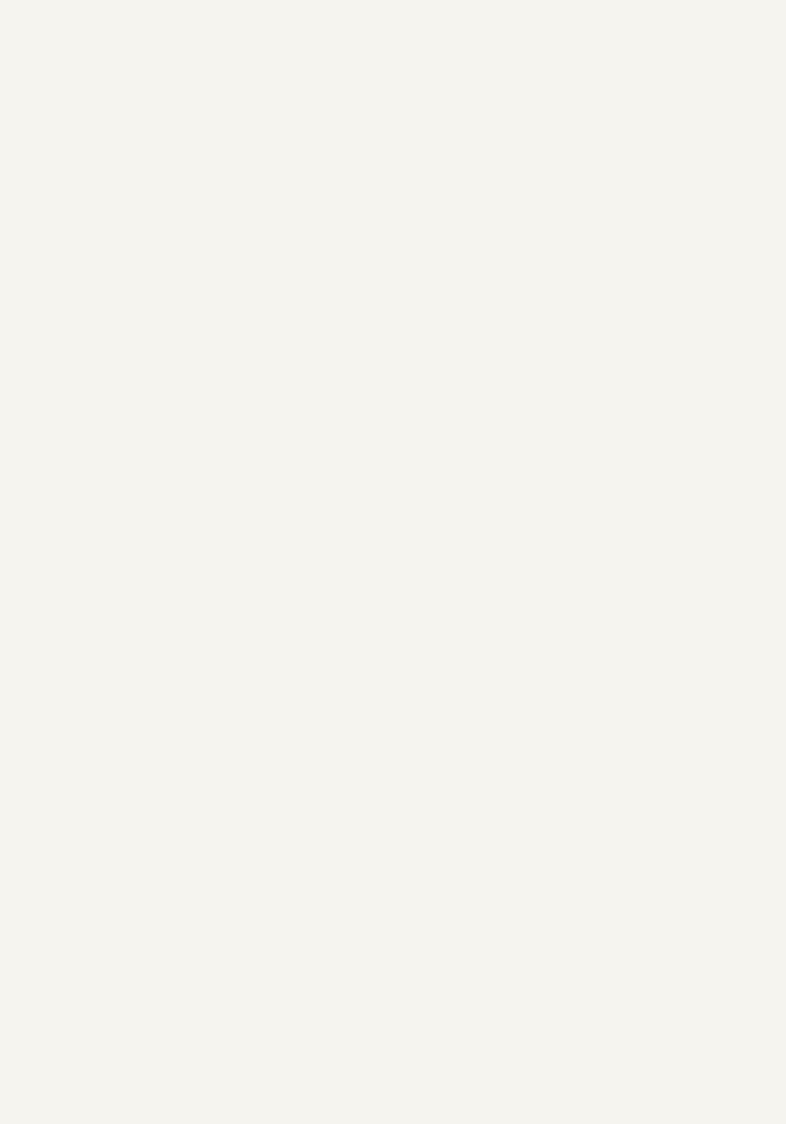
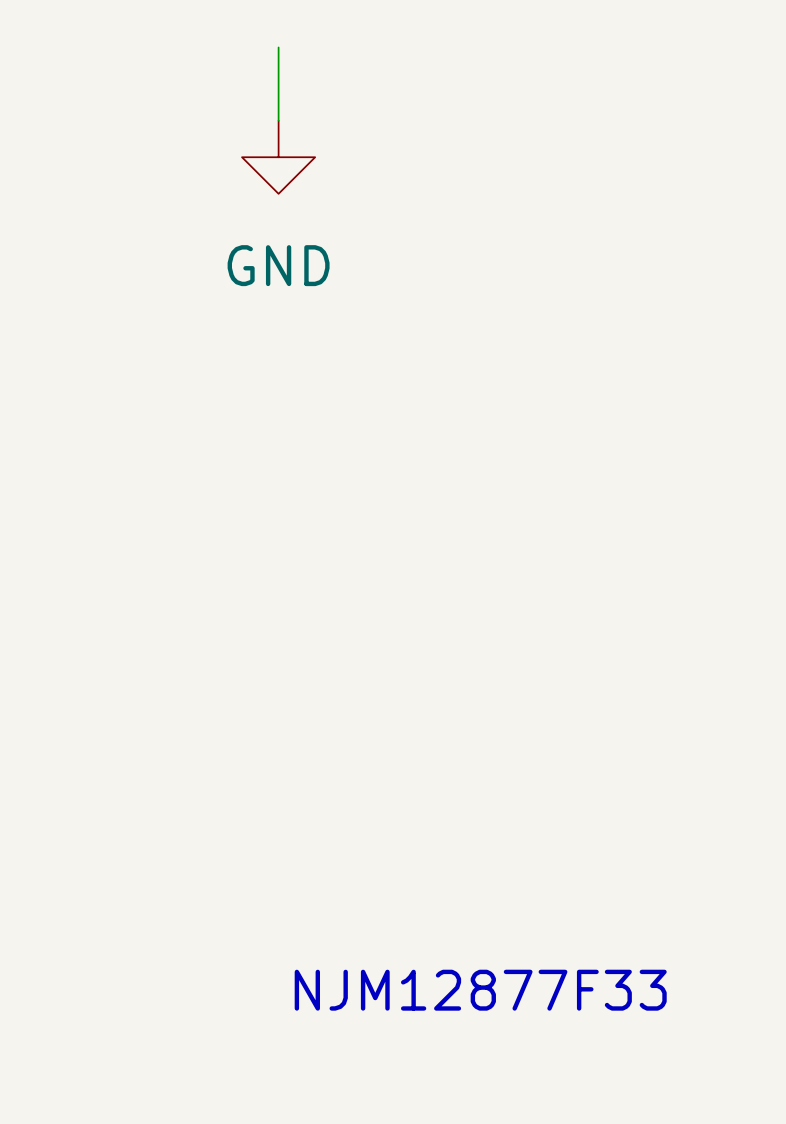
wire: none -> (278, 47) (278, 120)
power symbol: none -> GND (278, 157)
text: none -> NJM12877F33 (480, 990)

